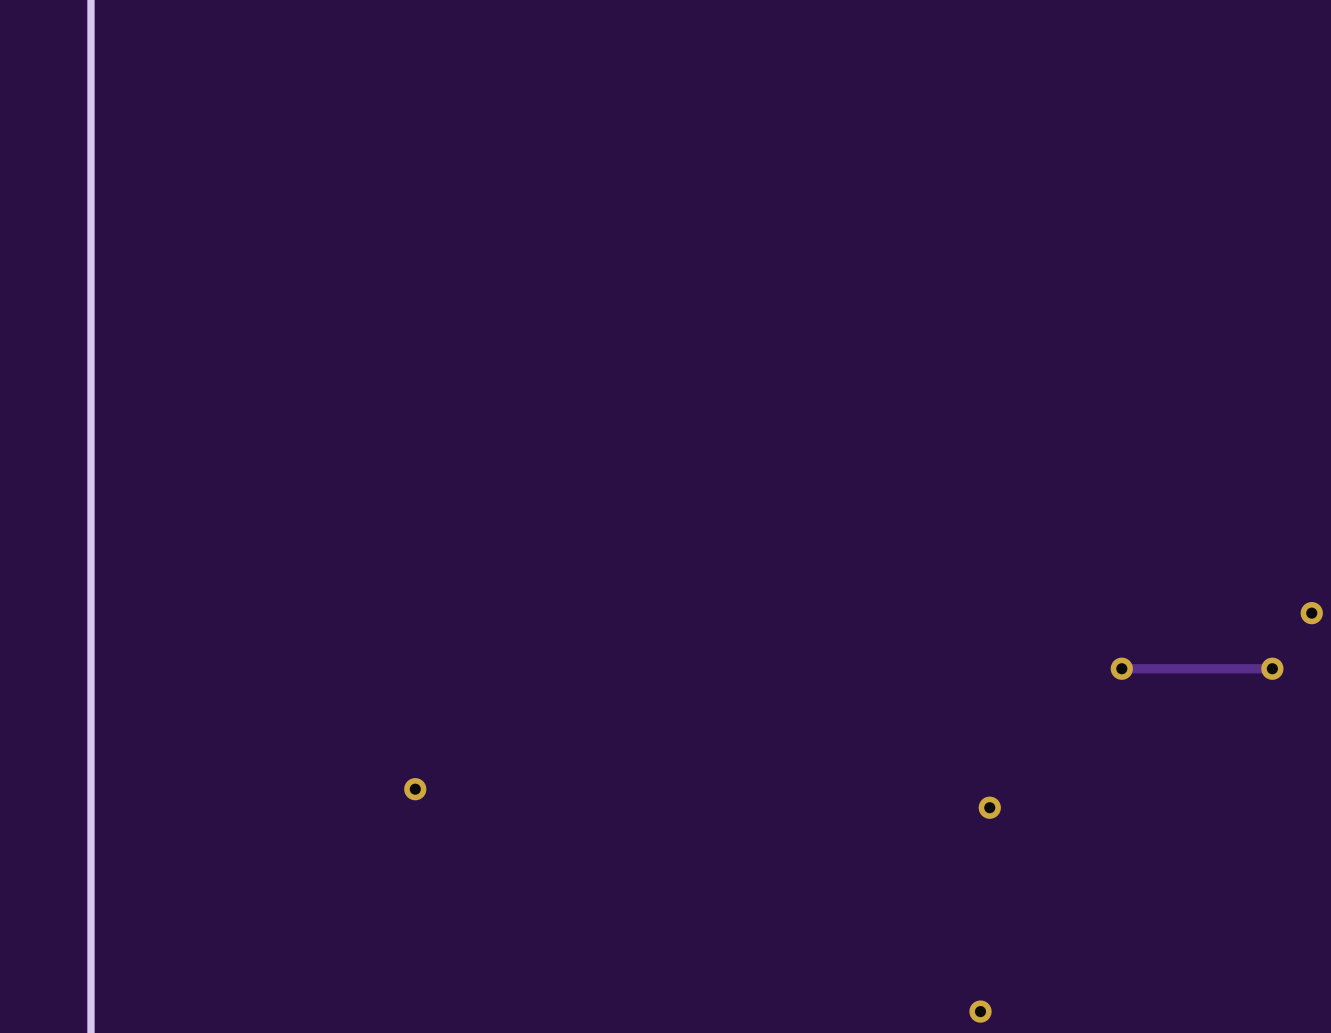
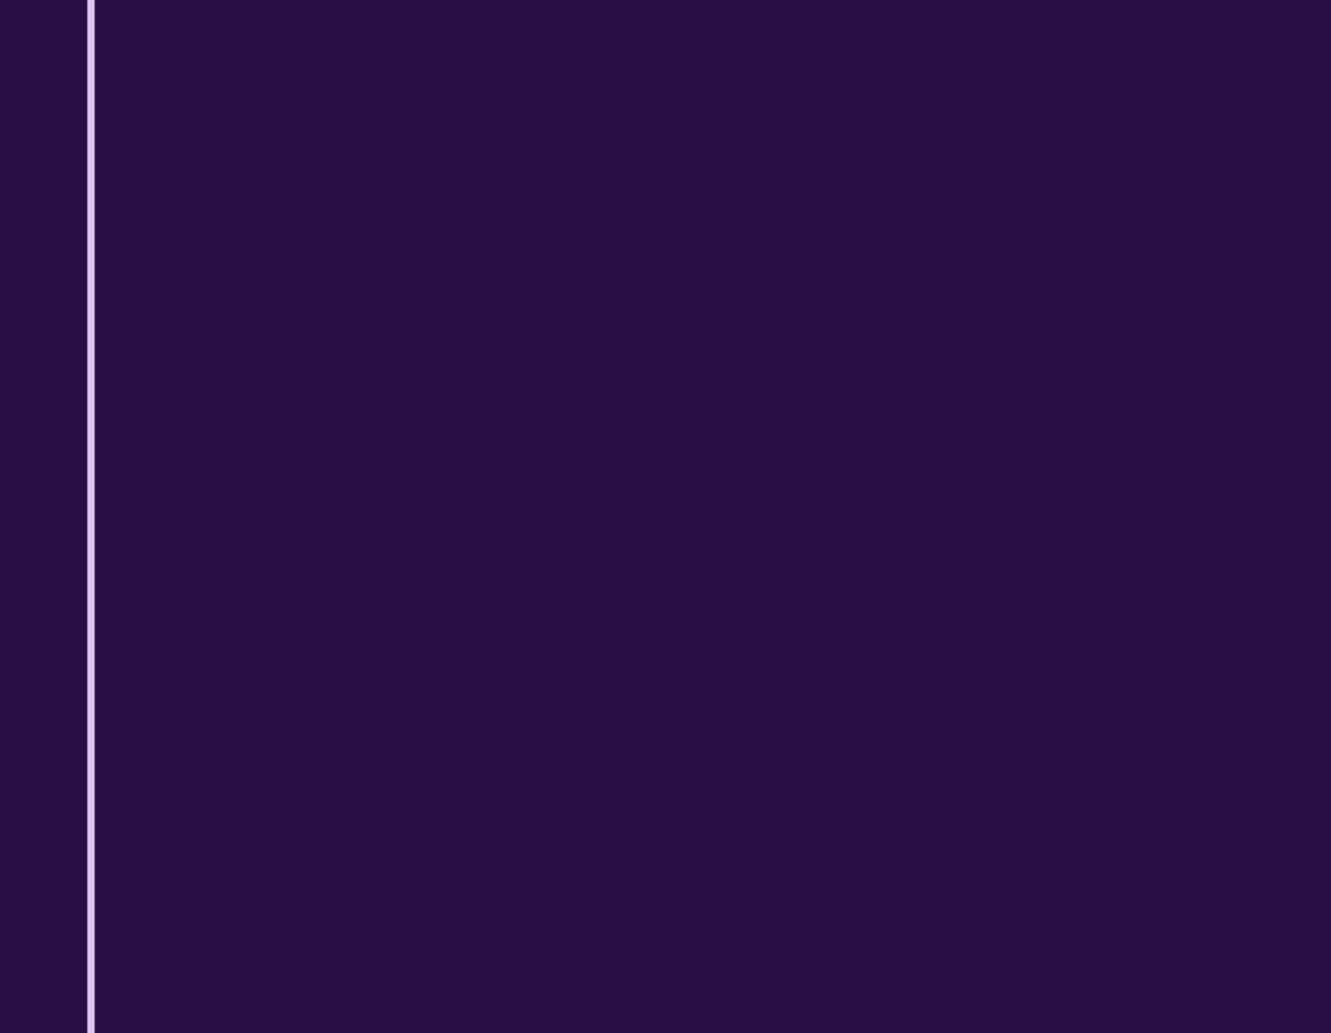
via: (1311, 613) -> none
via: (1121, 668) -> none
track: (1272, 668) (1121, 668) -> none
via: (1272, 668) -> none
via: (415, 789) -> none
via: (989, 807) -> none
via: (980, 1011) -> none

